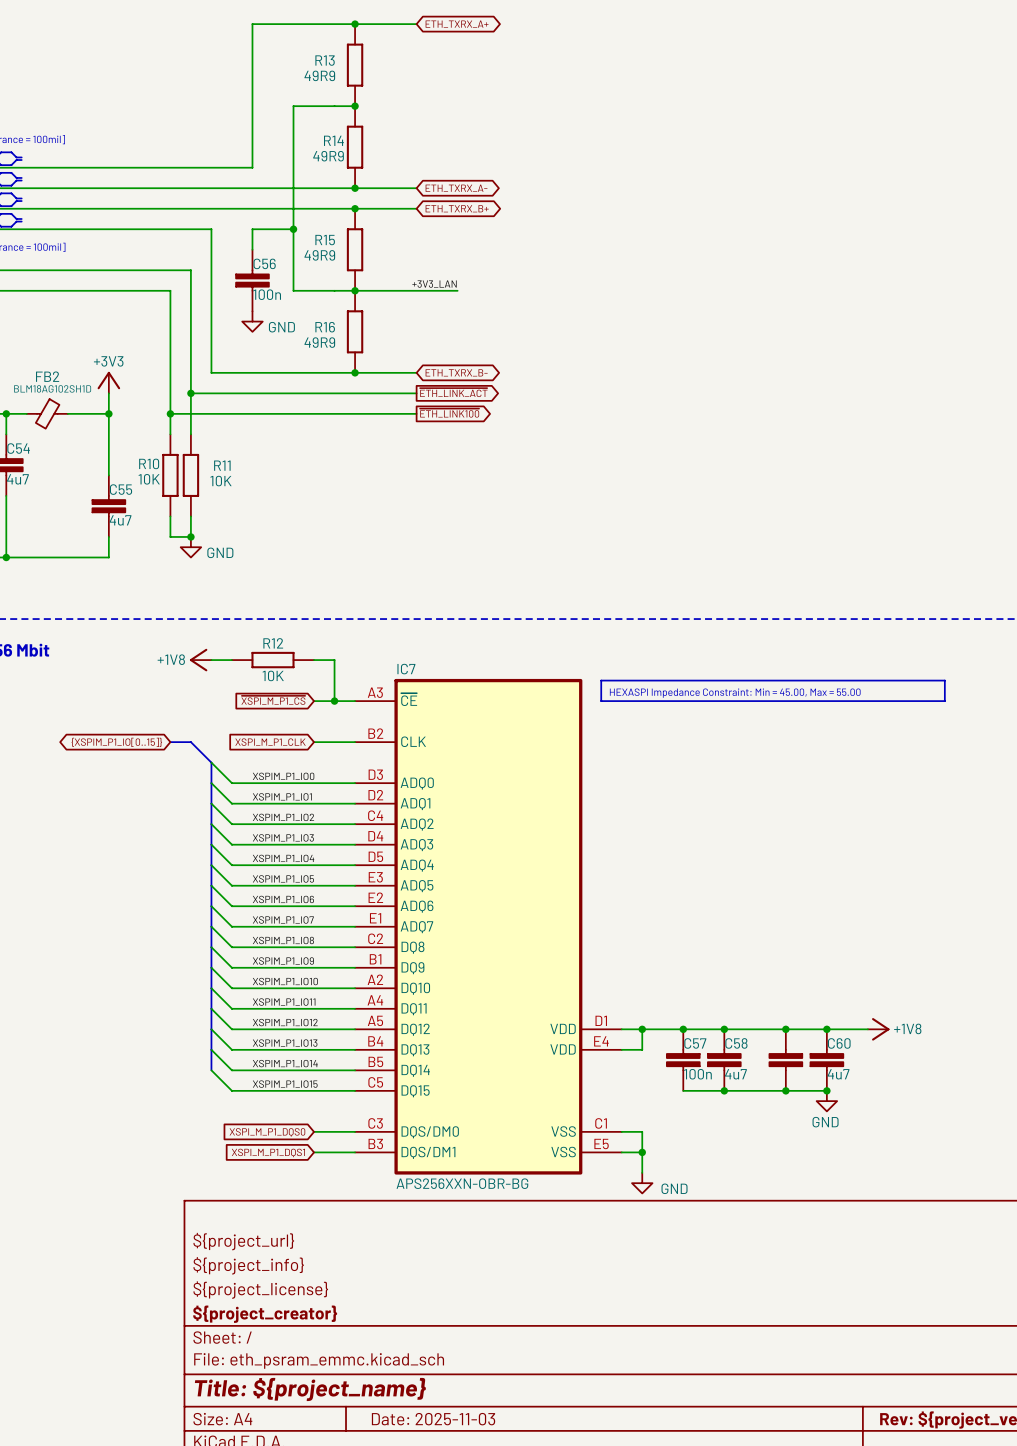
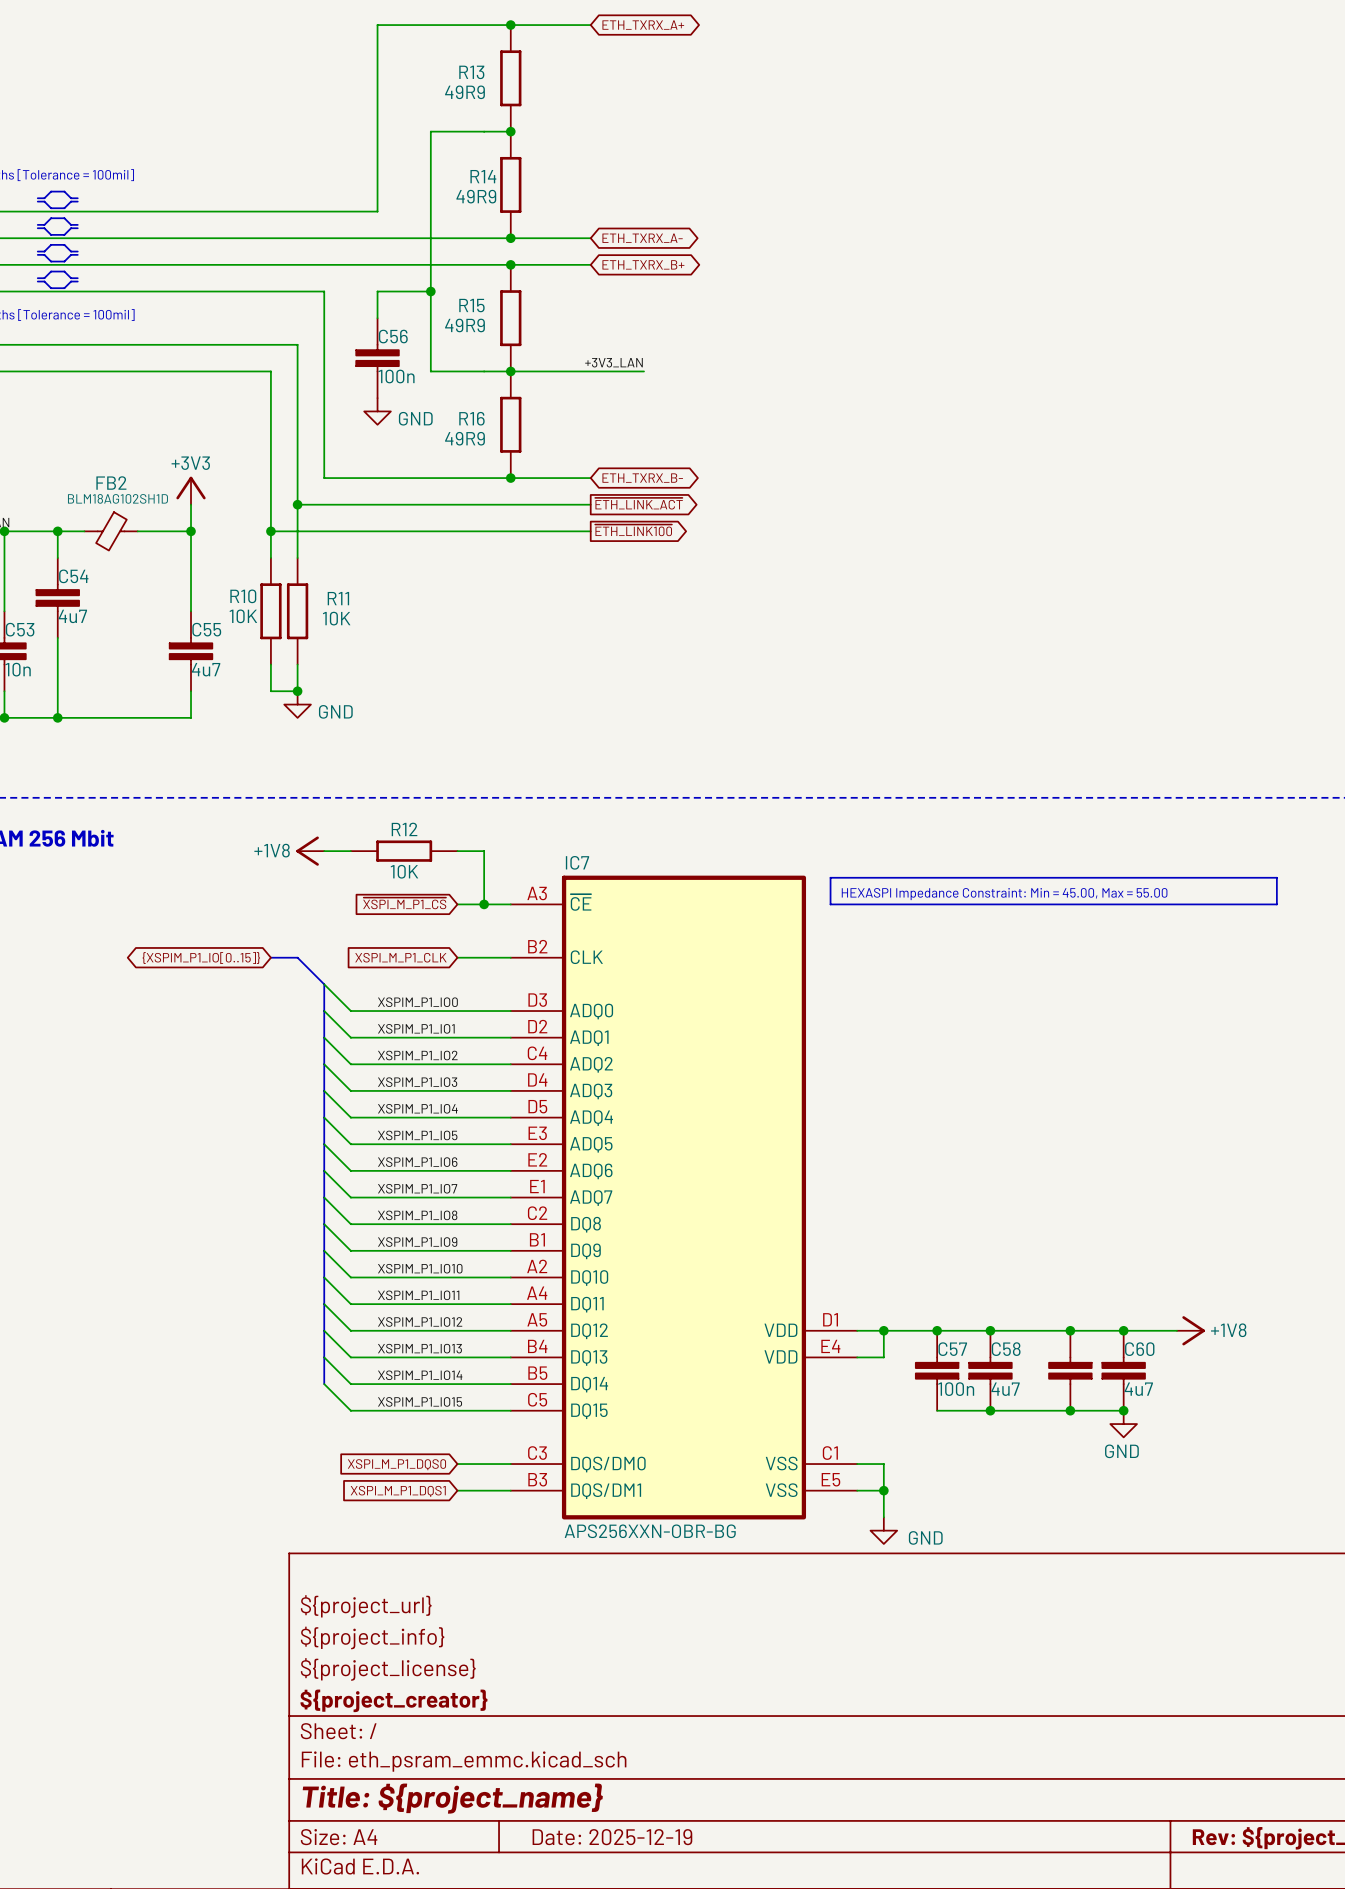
title block: Date: 2025-11-03 (433, 1419) -> Date: 2025-12-19 (612, 1837)

